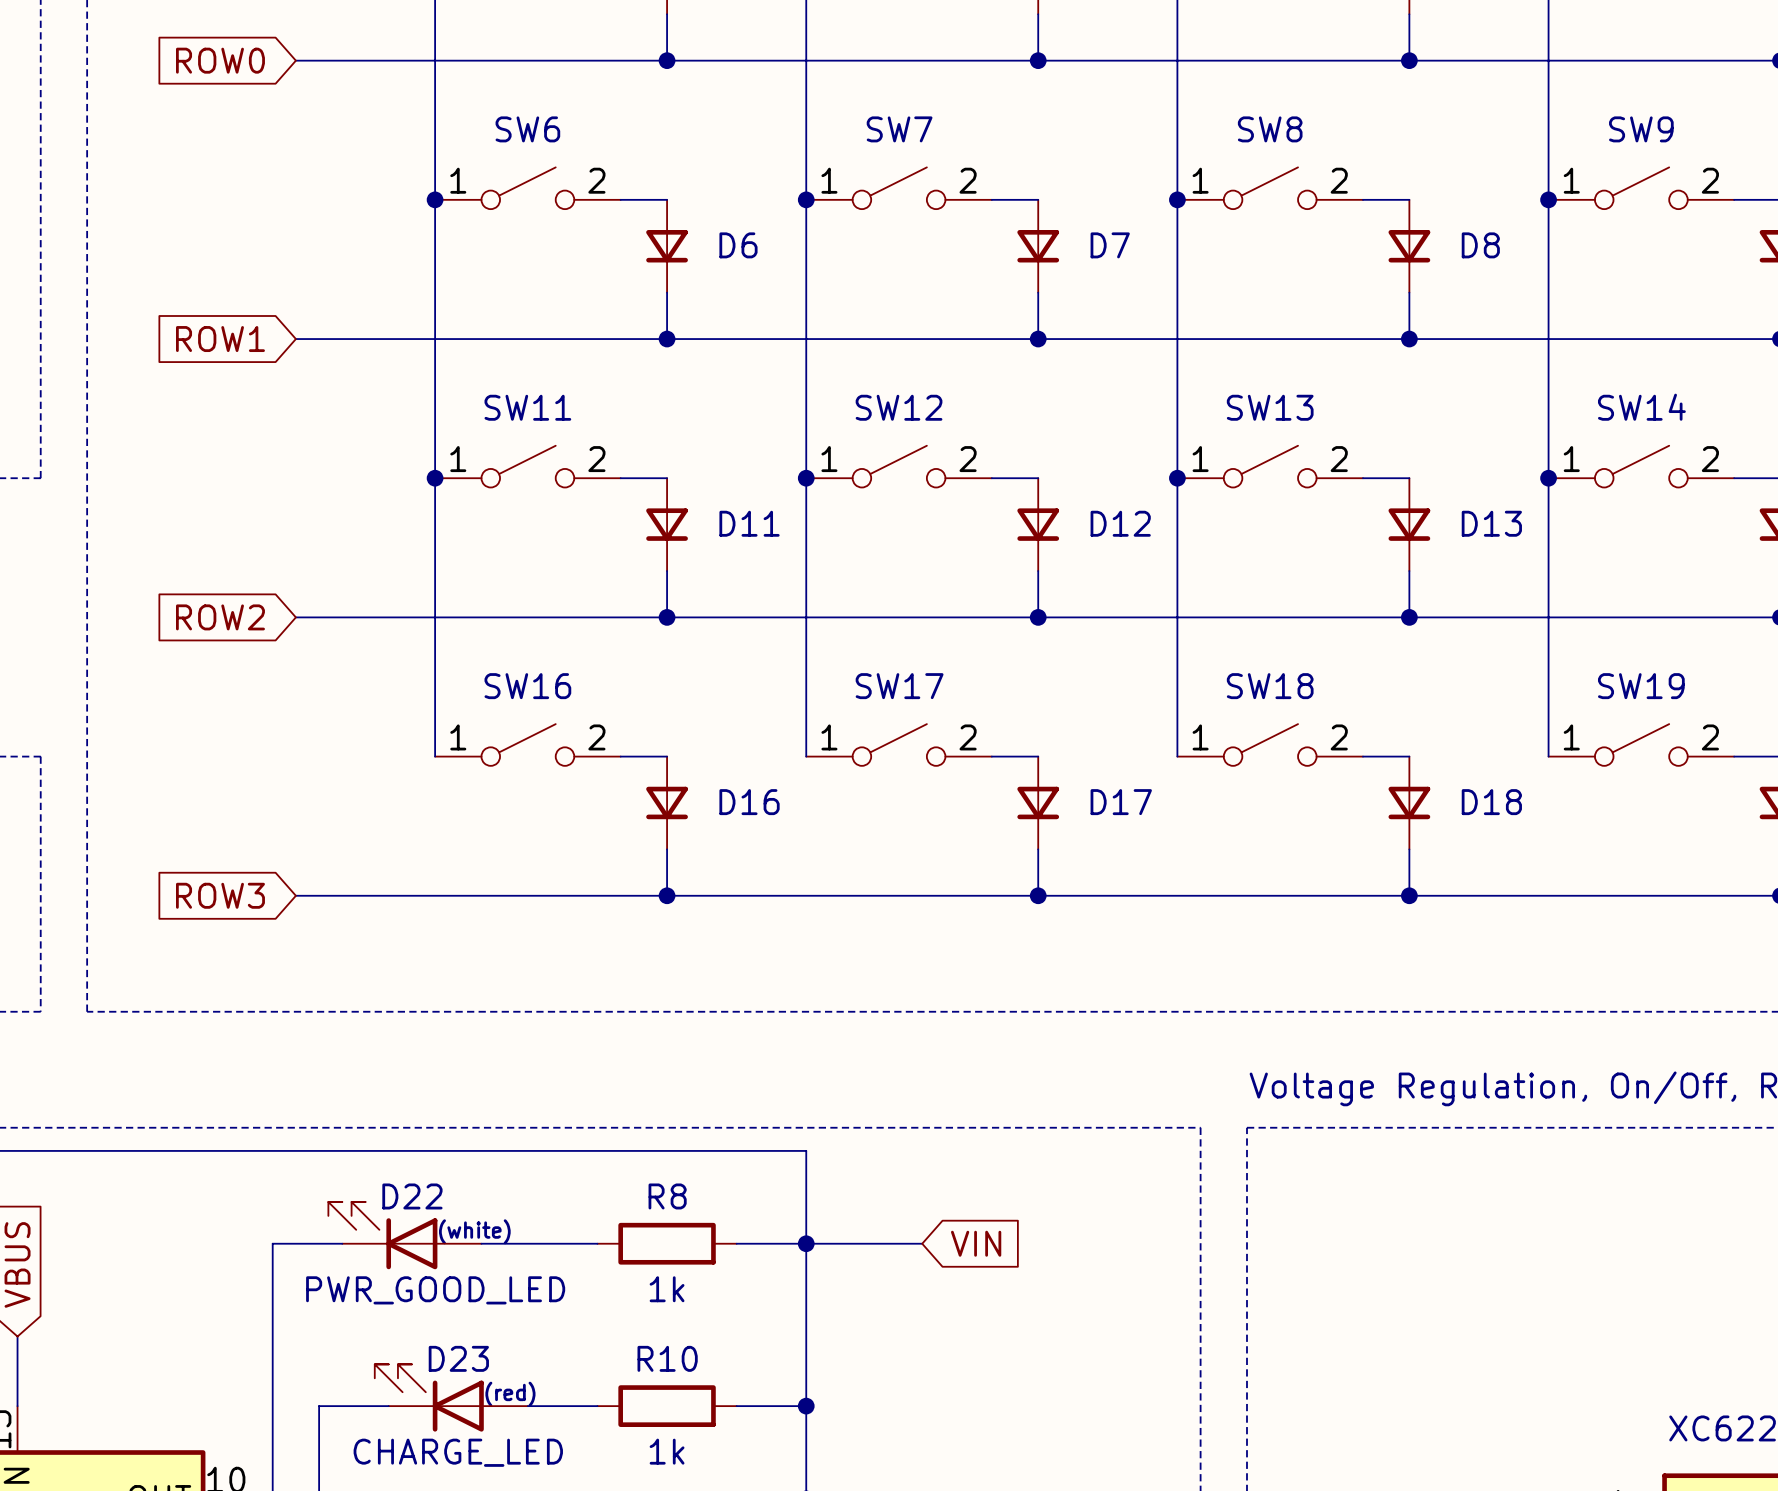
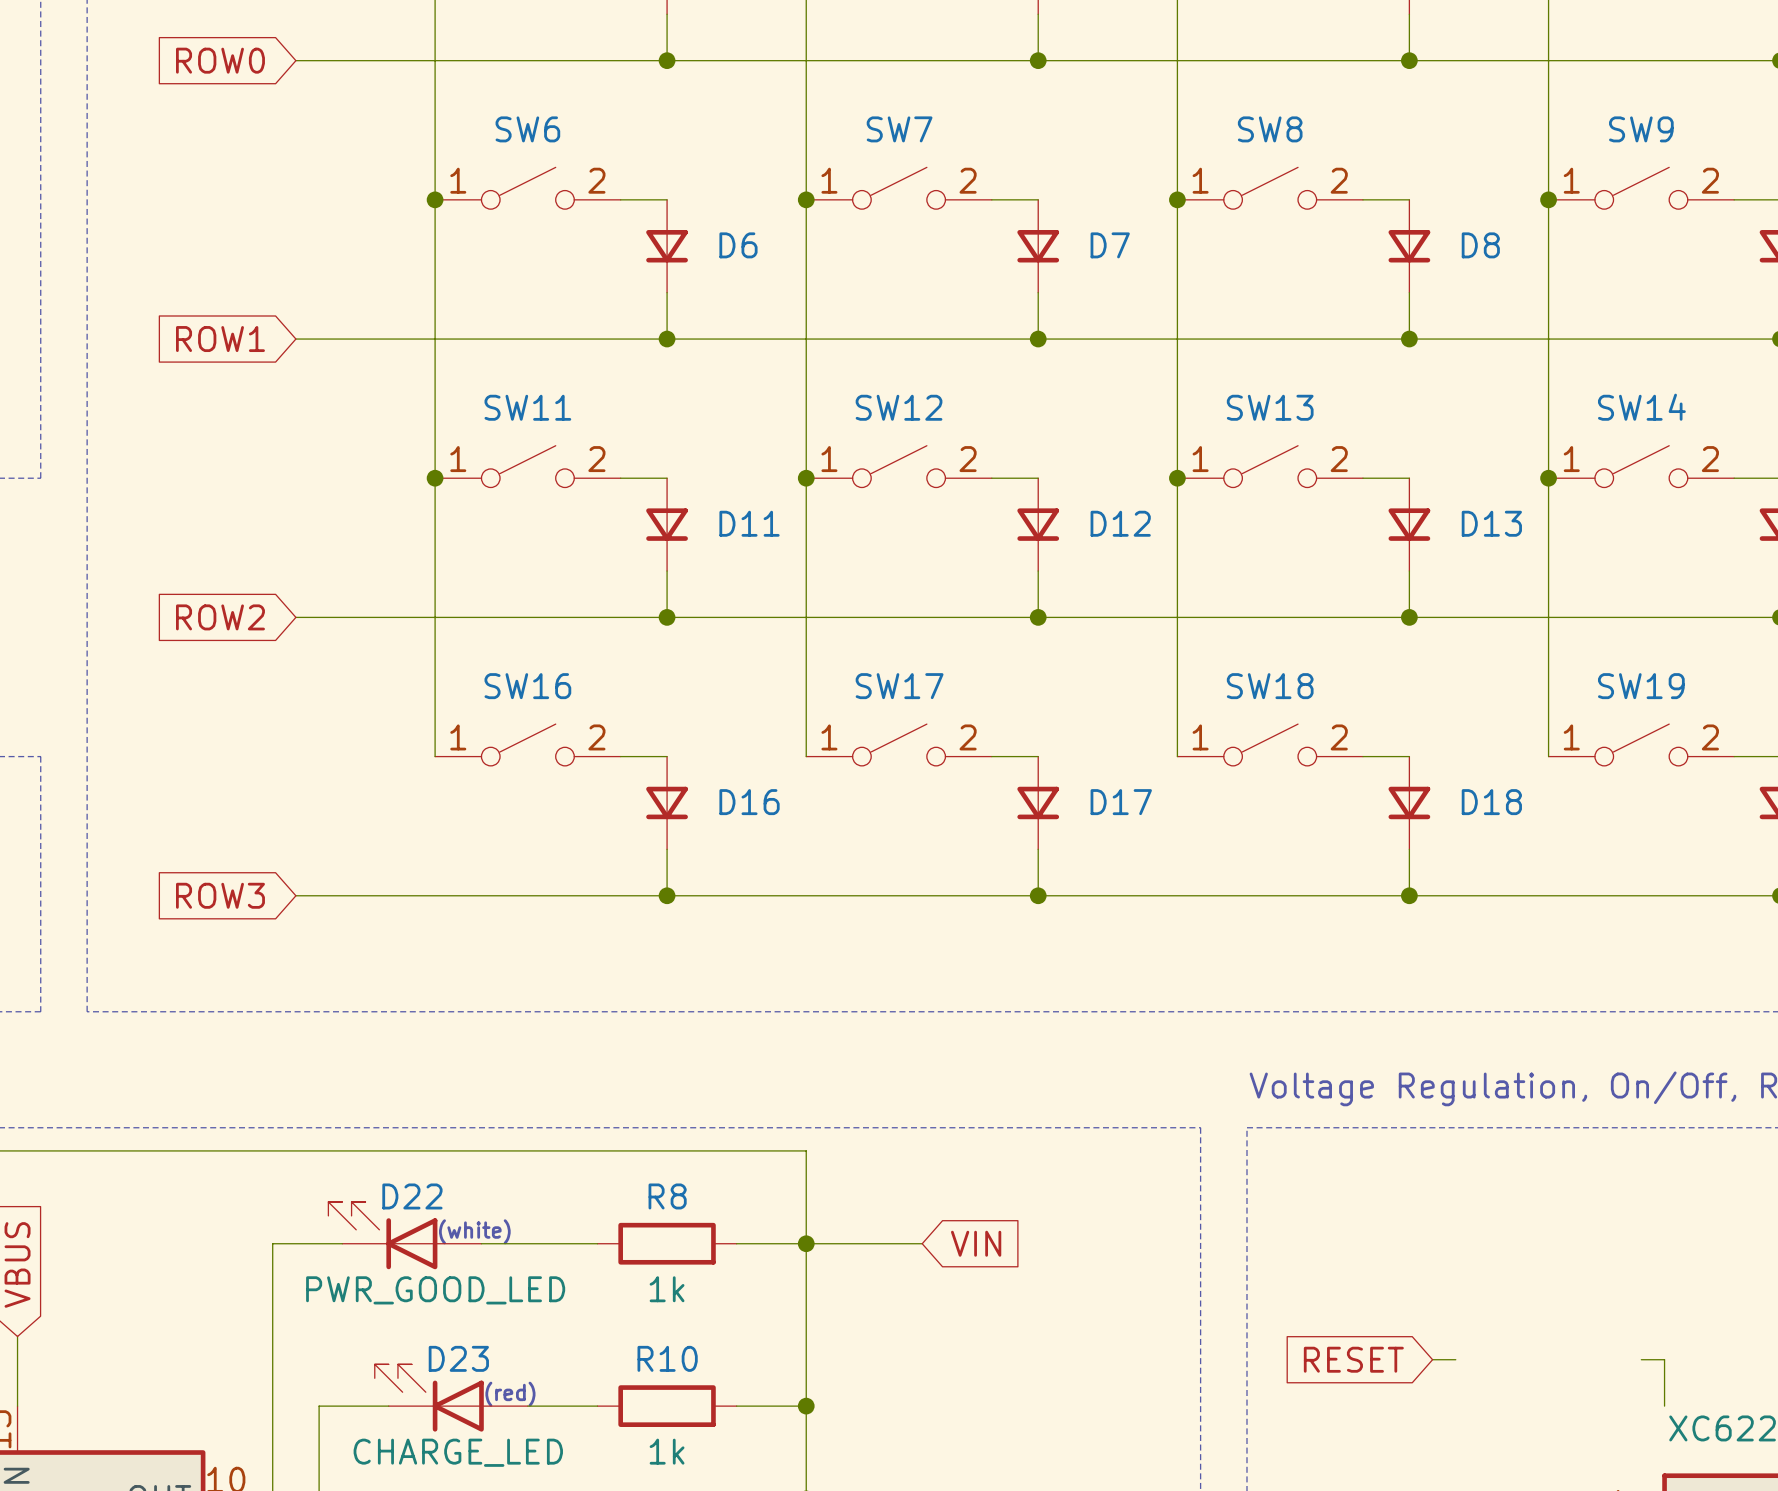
global label: none -> RESET (1353, 1359)
wire: none -> (1432, 1359) (1455, 1359)
wire: none -> (1641, 1359) (1664, 1359) (1664, 1406)

